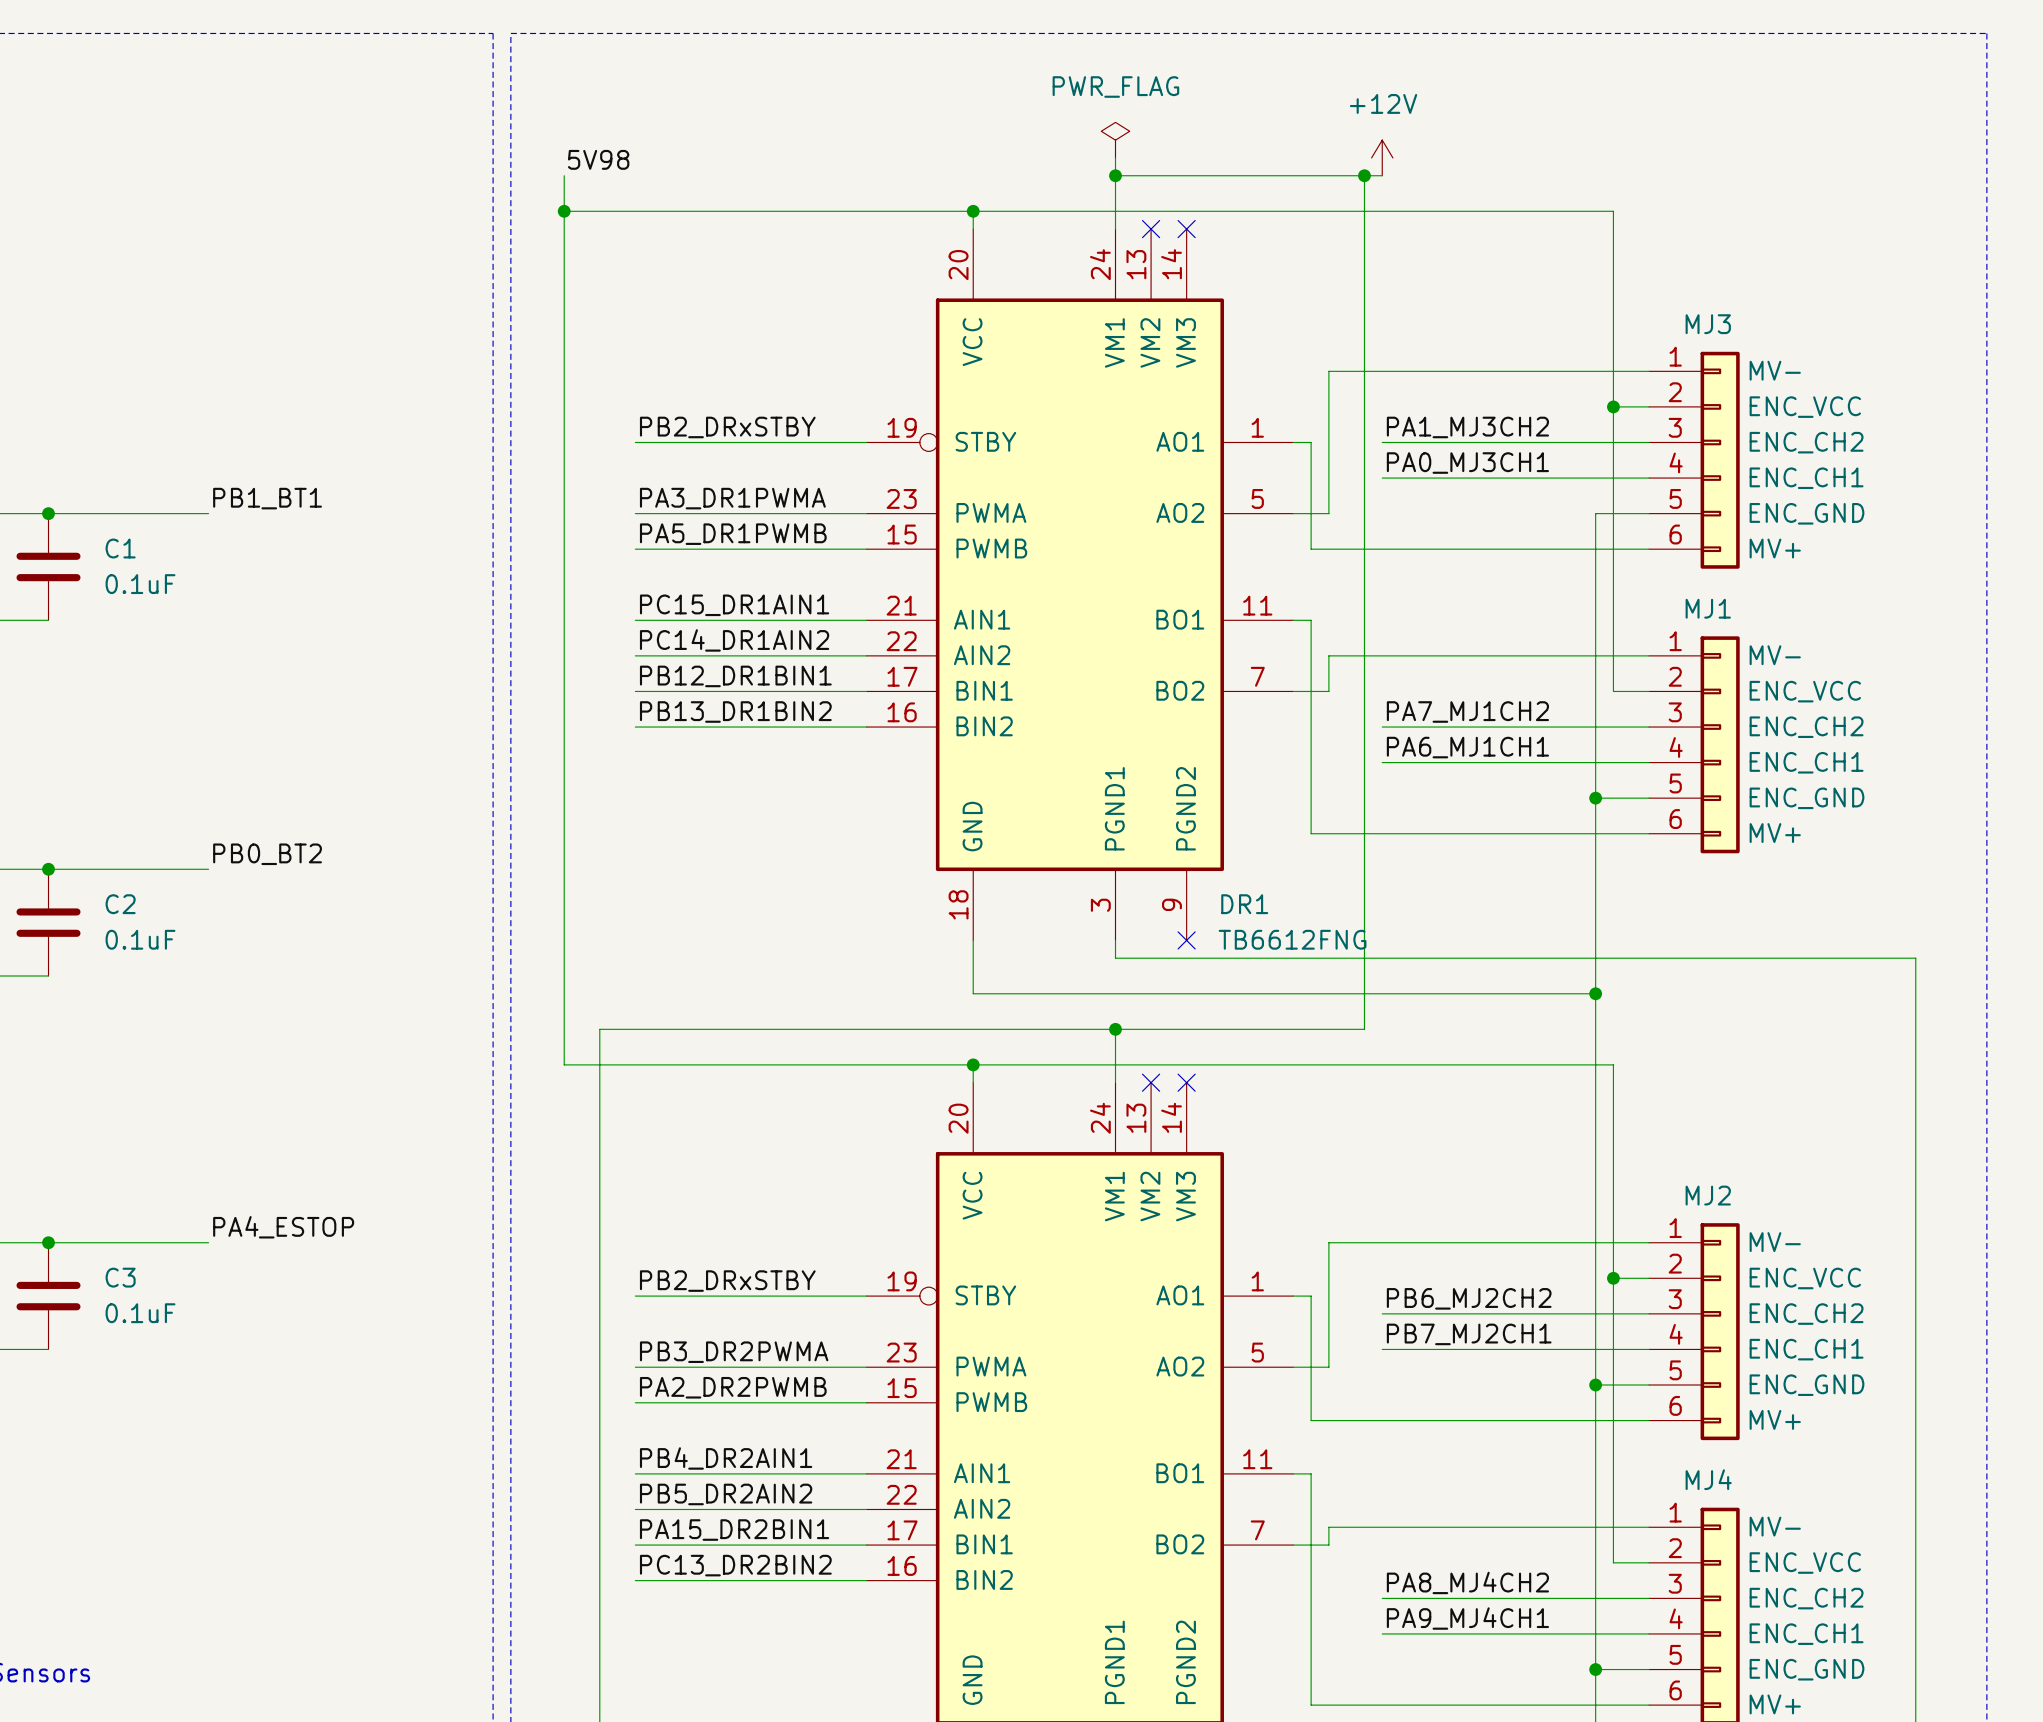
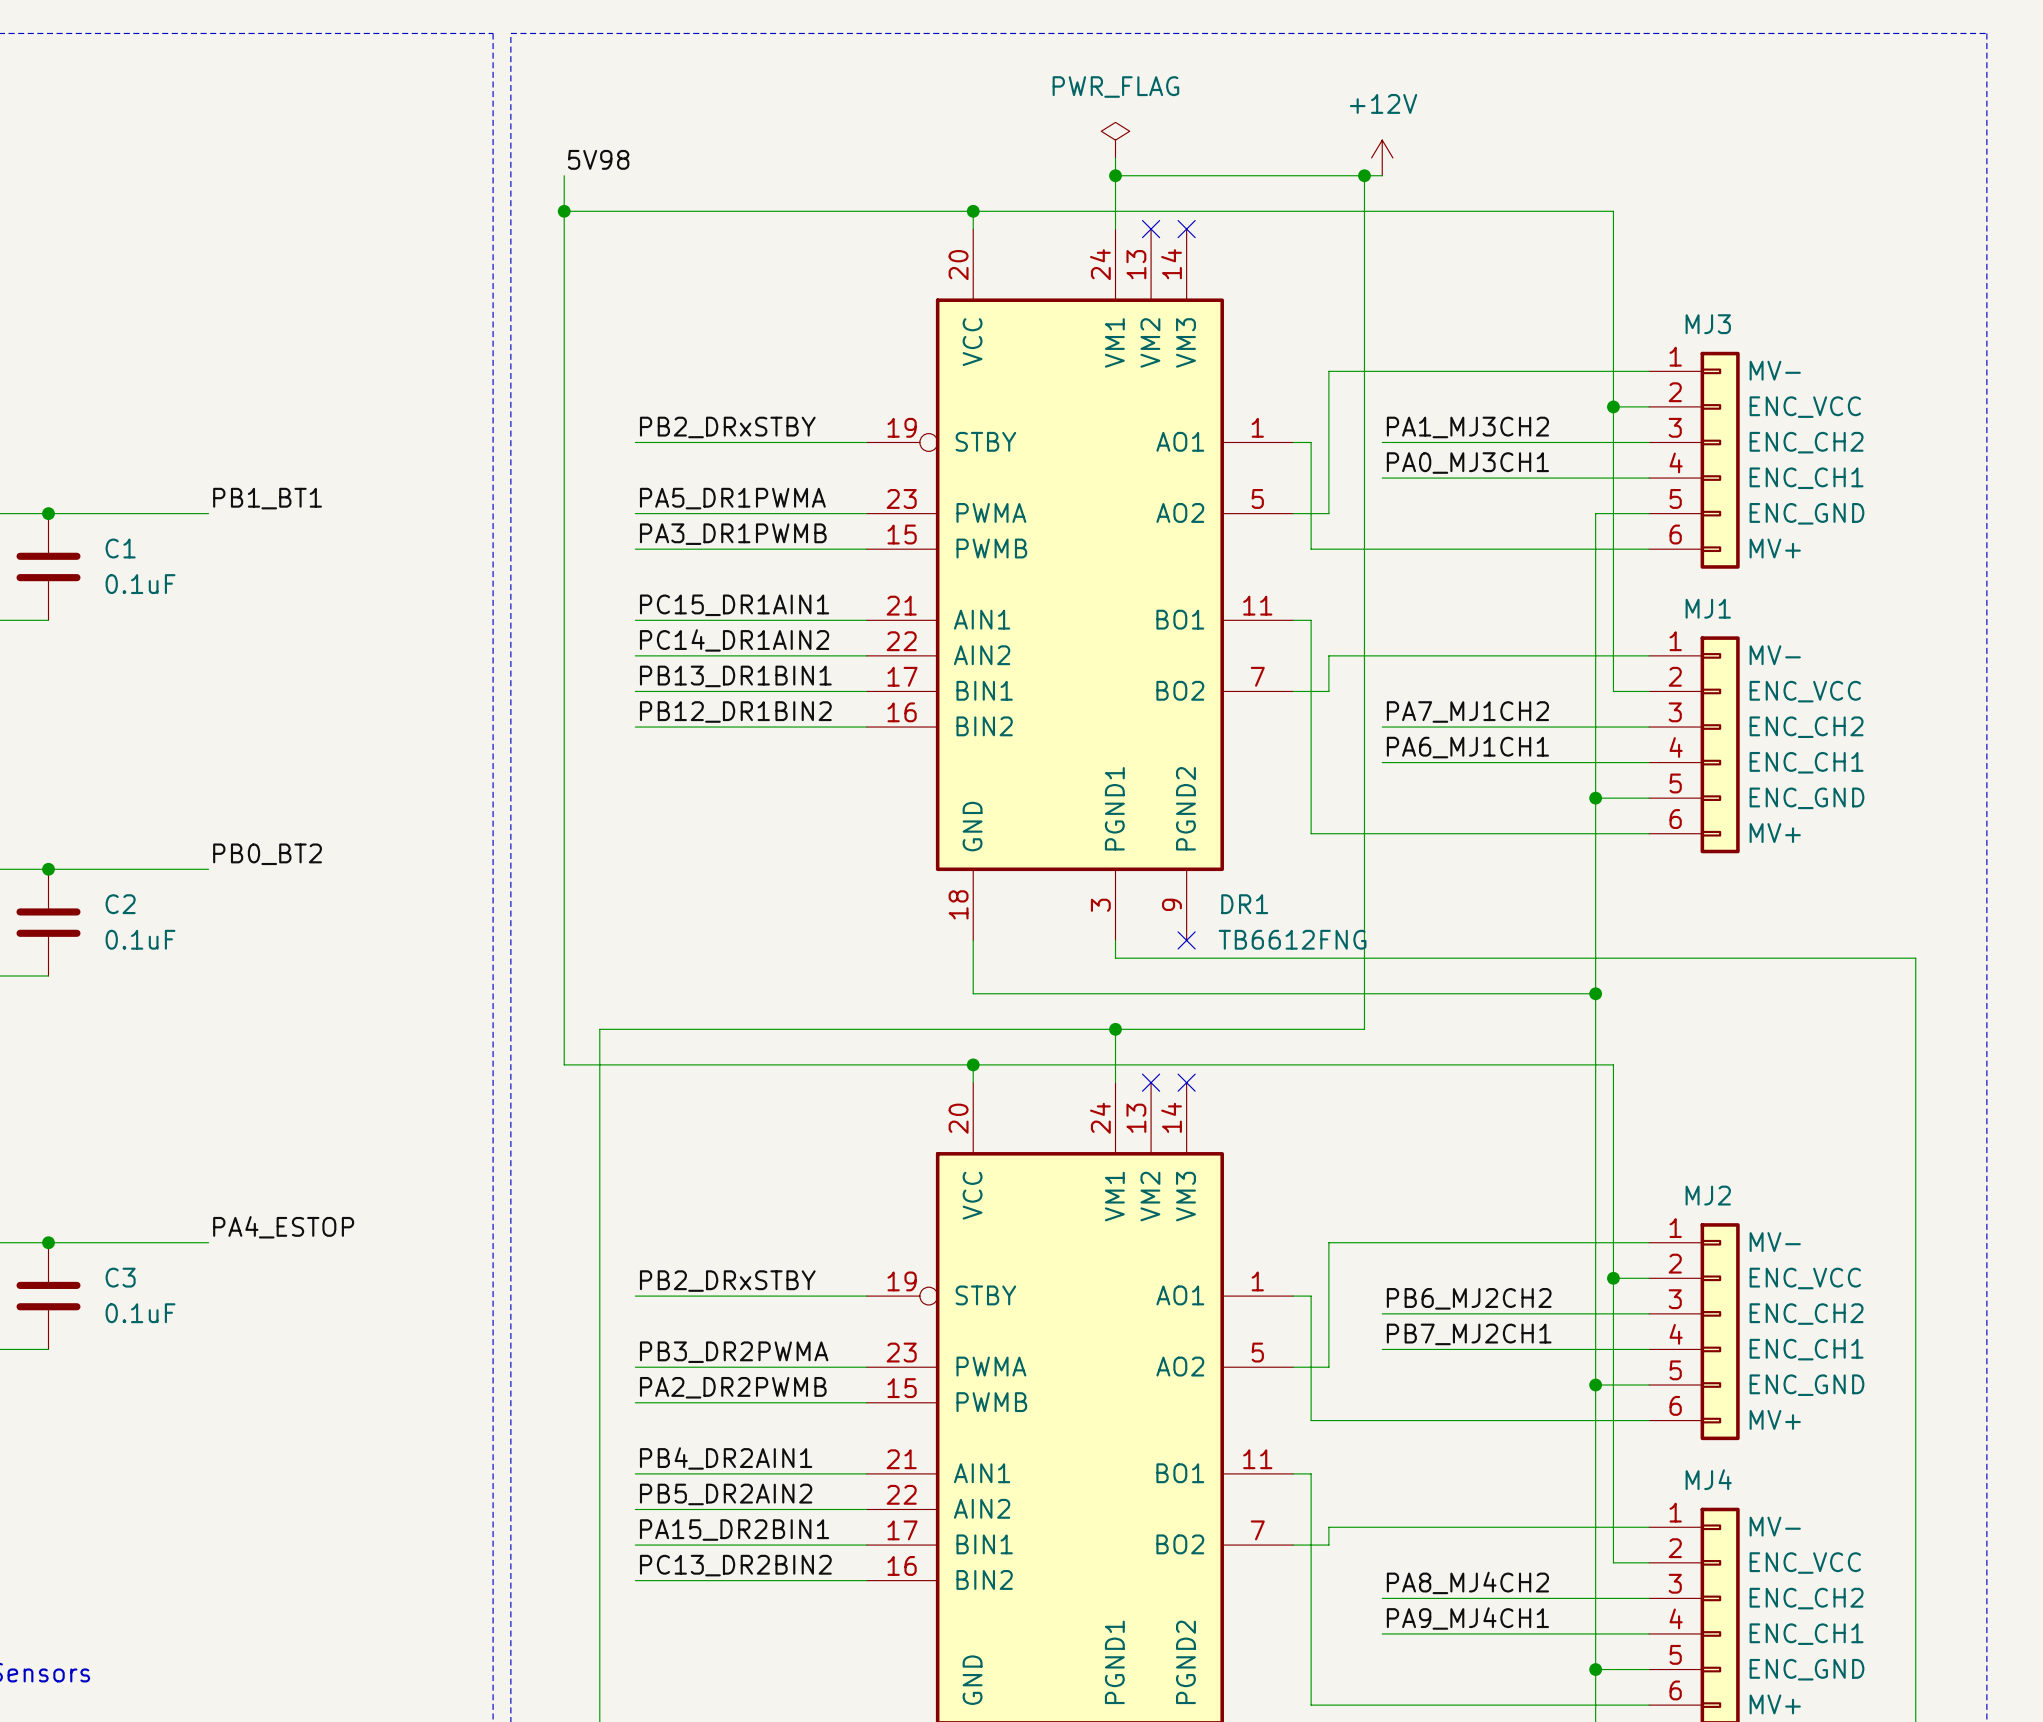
label: PA3_DR1PWMA (732, 498) -> PA5_DR1PWMA (732, 498)
label: PA5_DR1PWMB (733, 534) -> PA3_DR1PWMB (733, 534)
label: PB12_DR1BIN1 (735, 676) -> PB13_DR1BIN1 (735, 676)
label: PB13_DR1BIN2 (735, 711) -> PB12_DR1BIN2 (735, 711)

